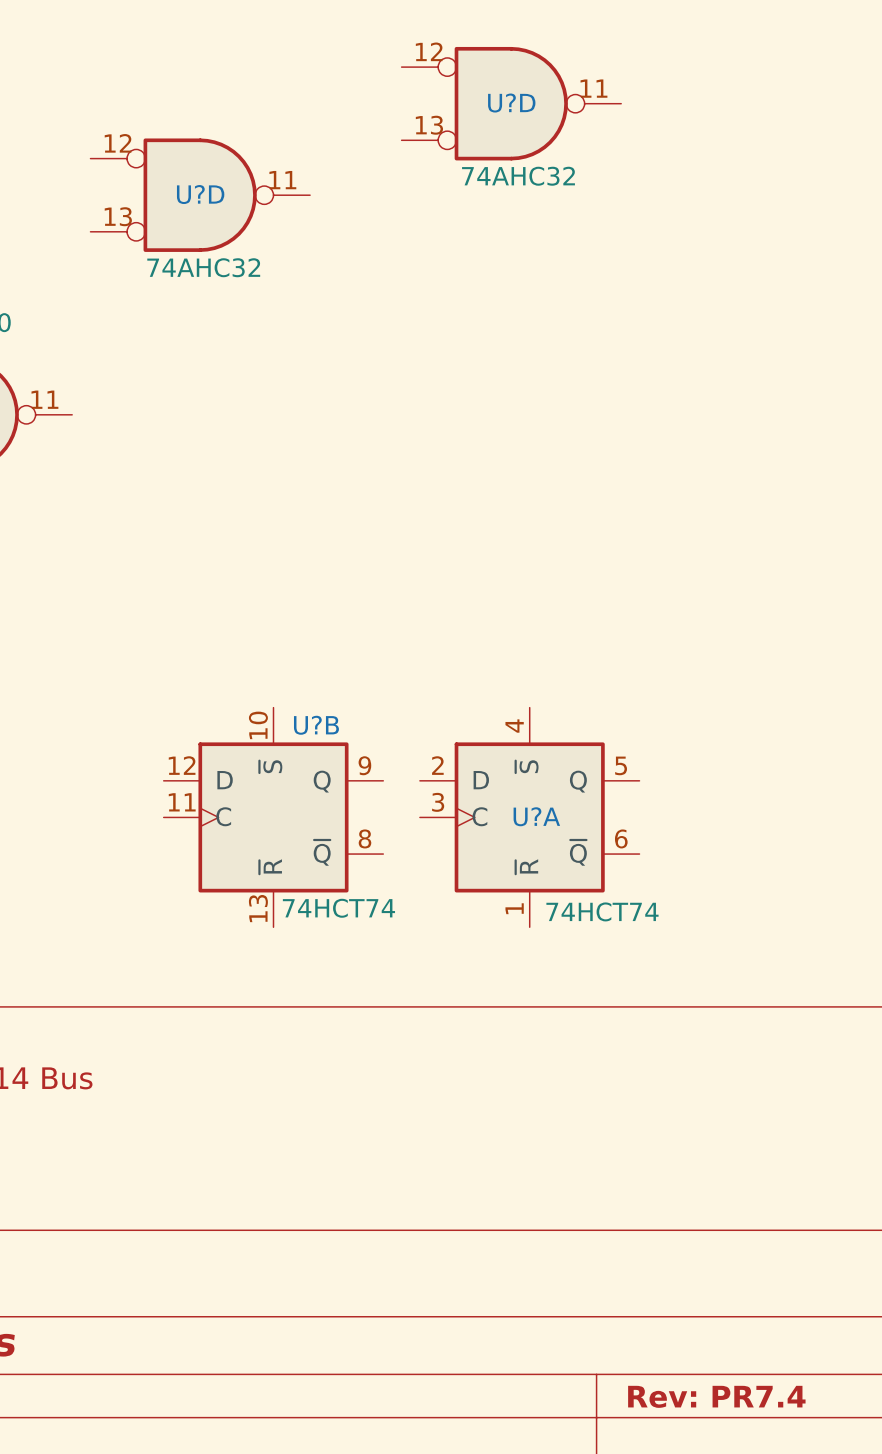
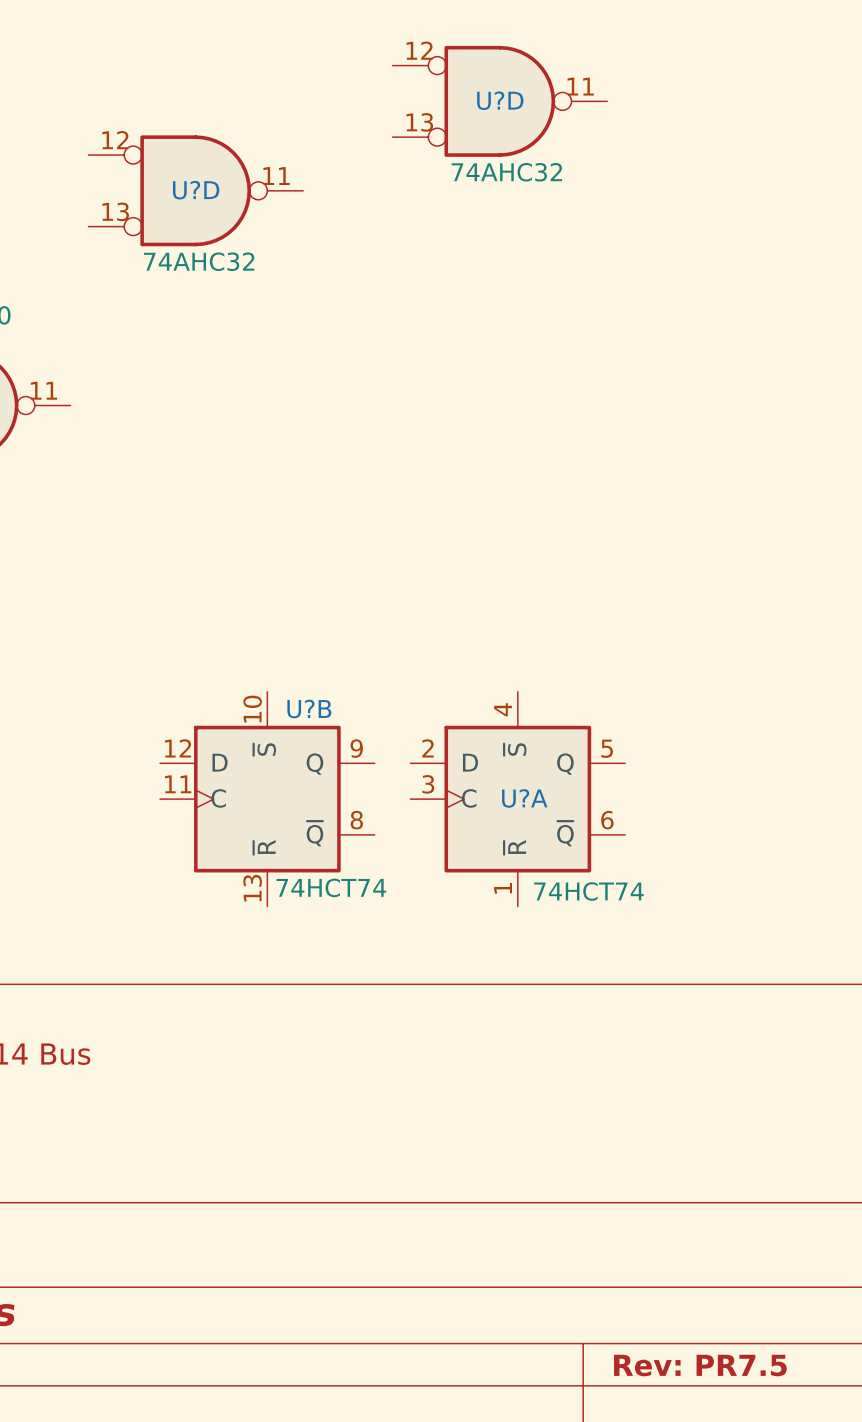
title block: Rev: PR7.4 (716, 1396) -> Rev: PR7.5 (700, 1365)

